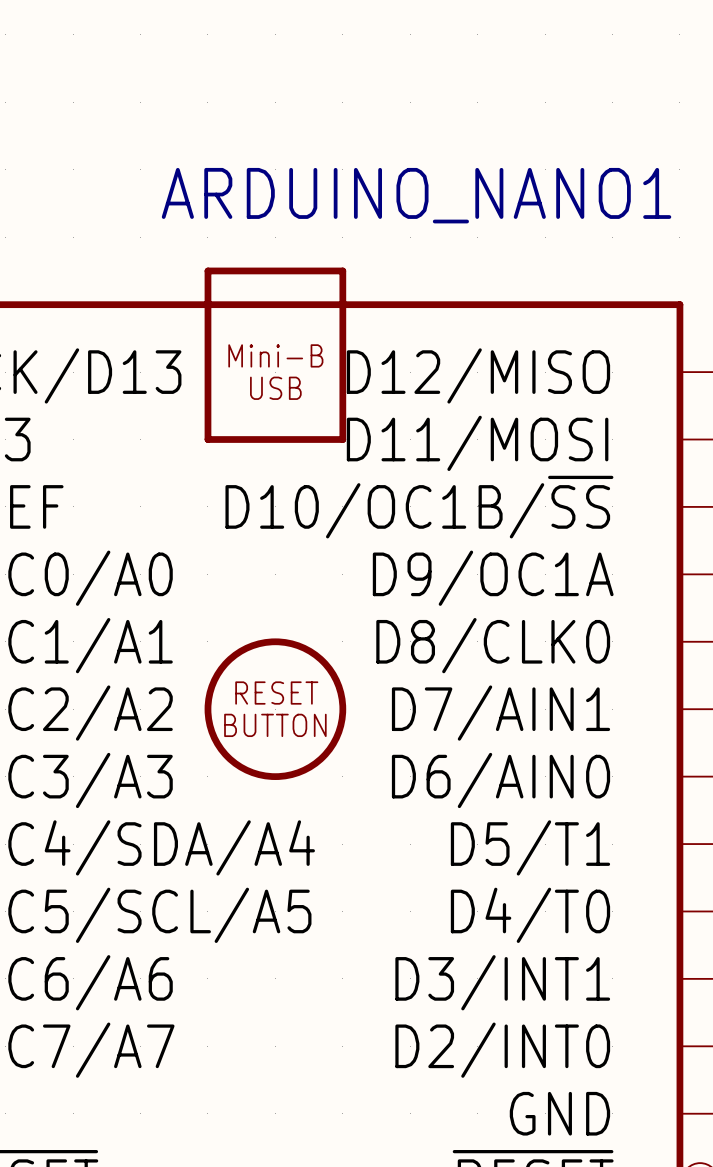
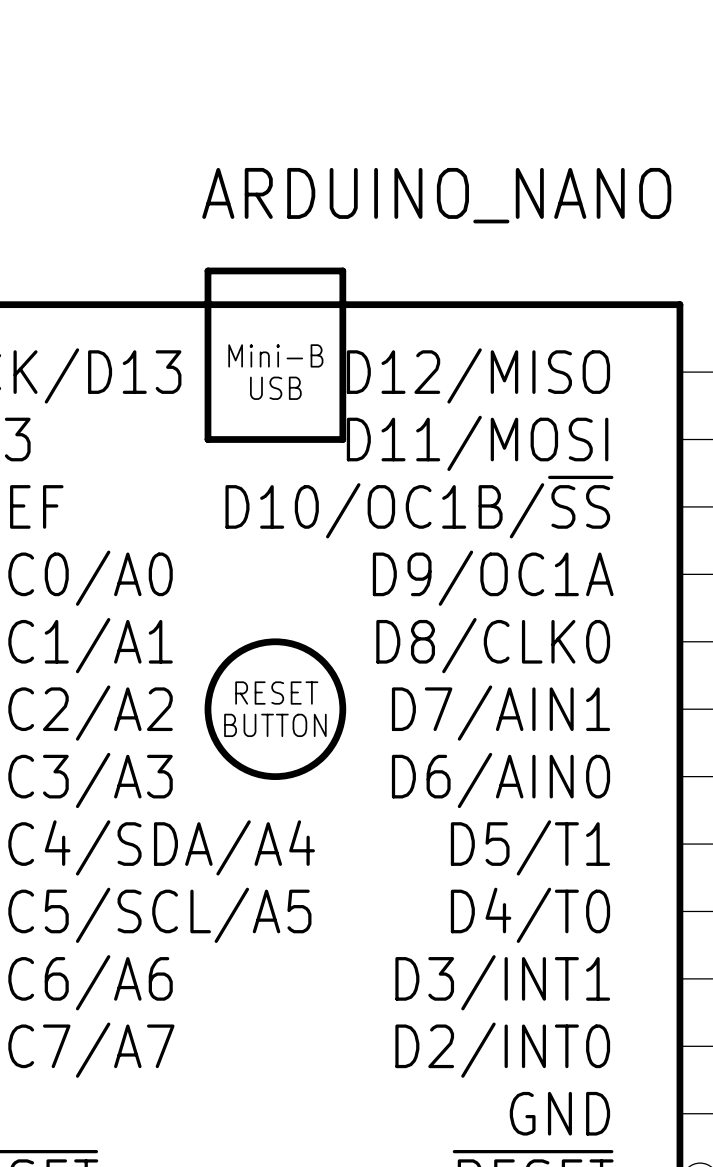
ARDUINO_NANO1 name: ARDUINO_NANO1 (416, 195) -> ARDUINO_NANO (436, 195)

